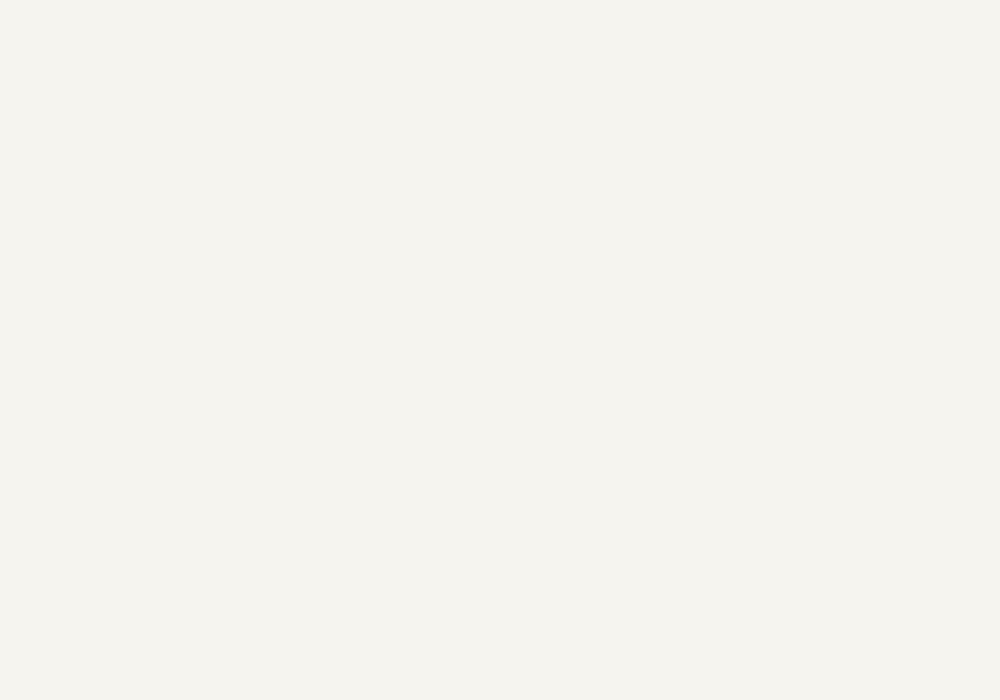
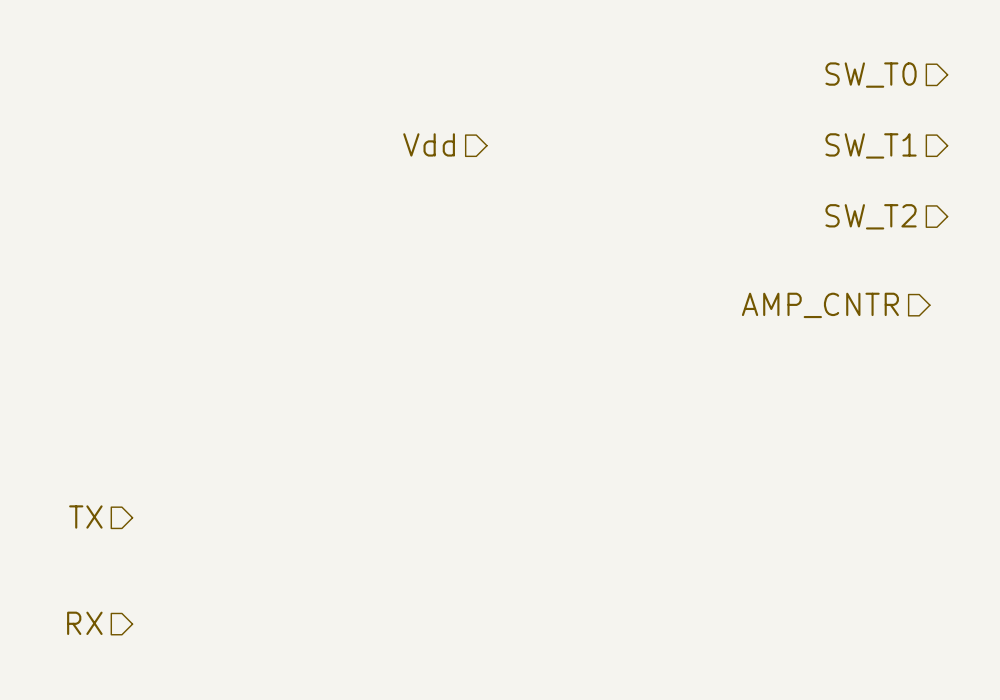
hierarchical label: none -> SW_T0 (871, 75)
hierarchical label: none -> Vdd (429, 144)
hierarchical label: none -> SW_T1 (871, 145)
hierarchical label: none -> SW_T2 (871, 216)
hierarchical label: none -> AMP_CNTR (820, 305)
hierarchical label: none -> TX (85, 517)
hierarchical label: none -> RX (84, 623)

